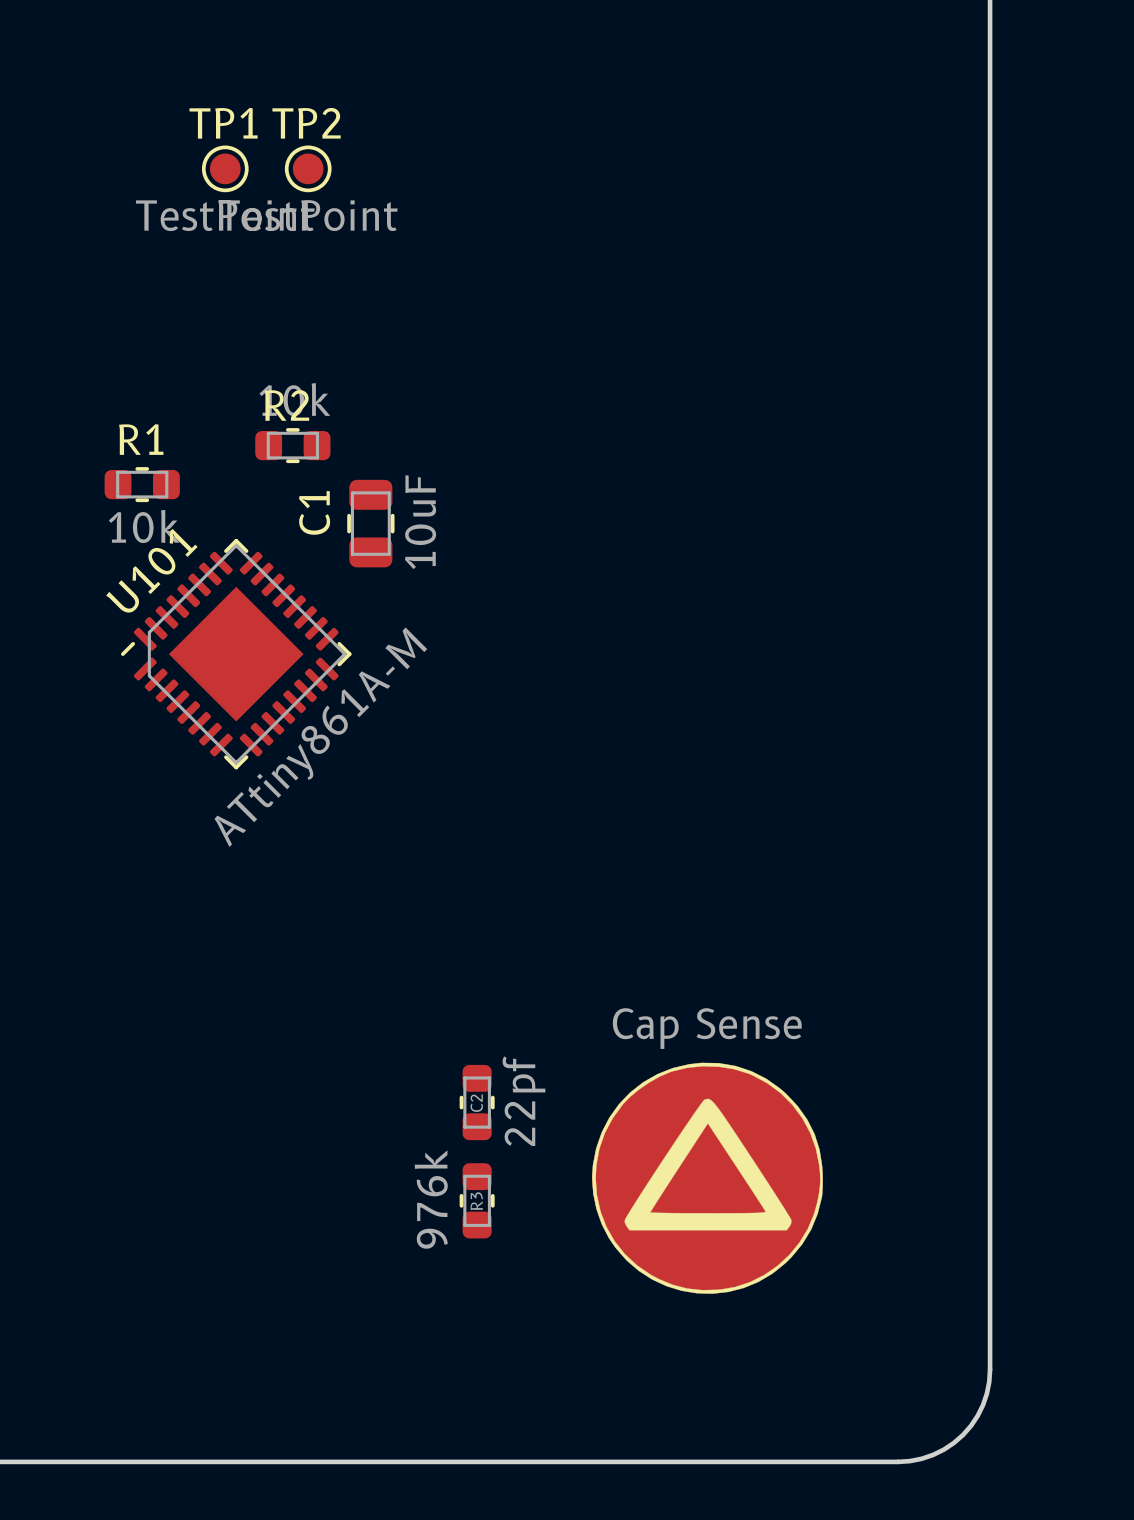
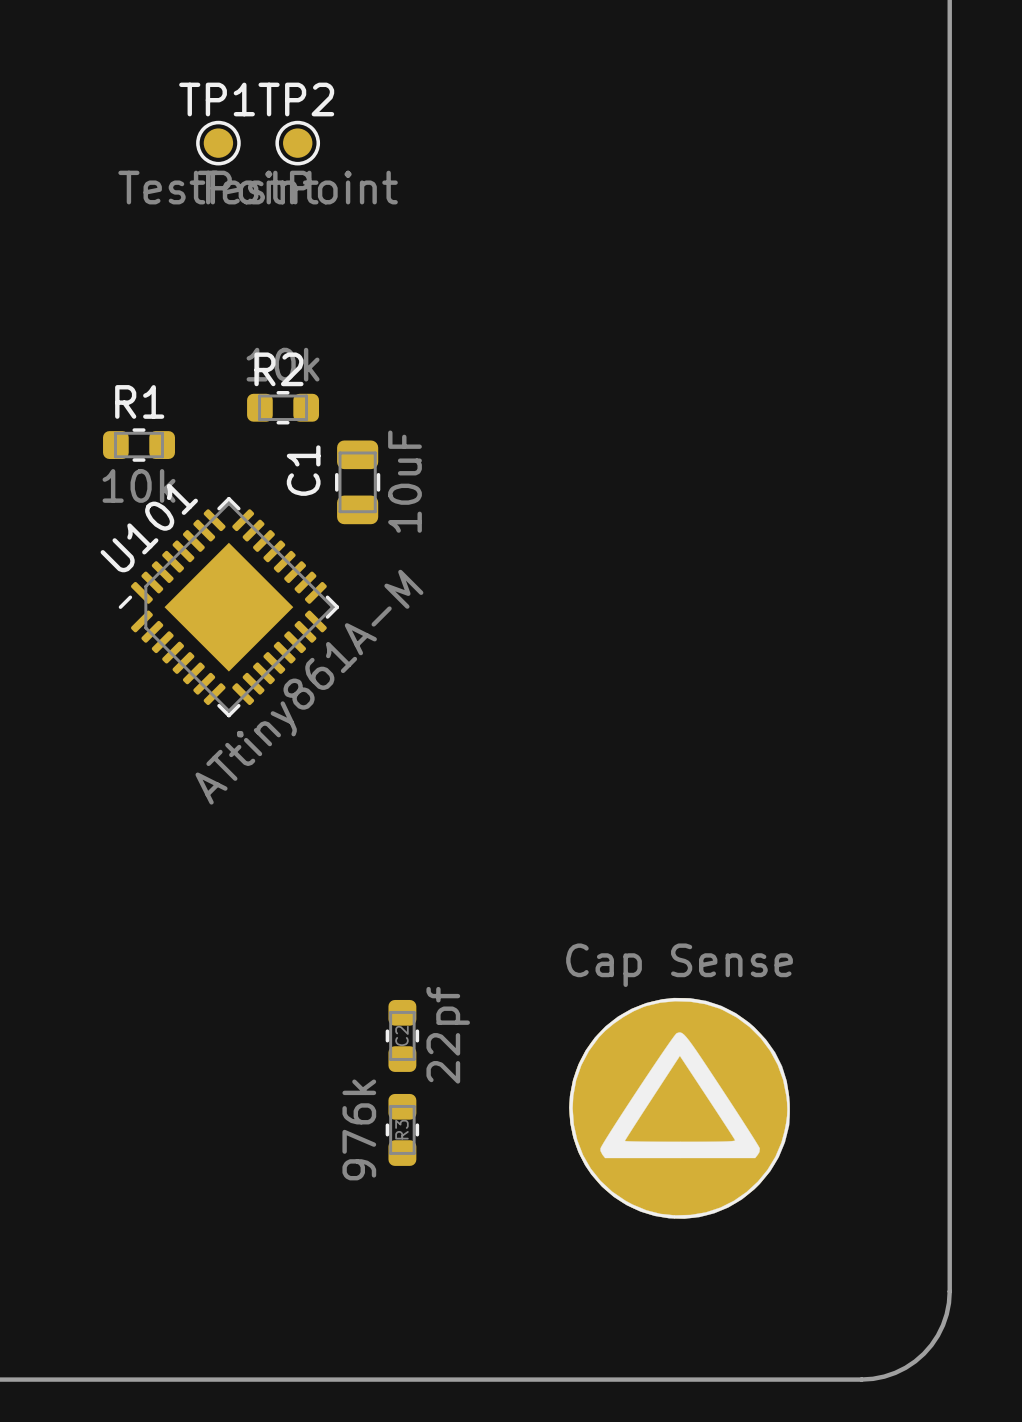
C2 position: (477, 1102) -> (402, 1035)
R3 position: (477, 1200) -> (402, 1129)

